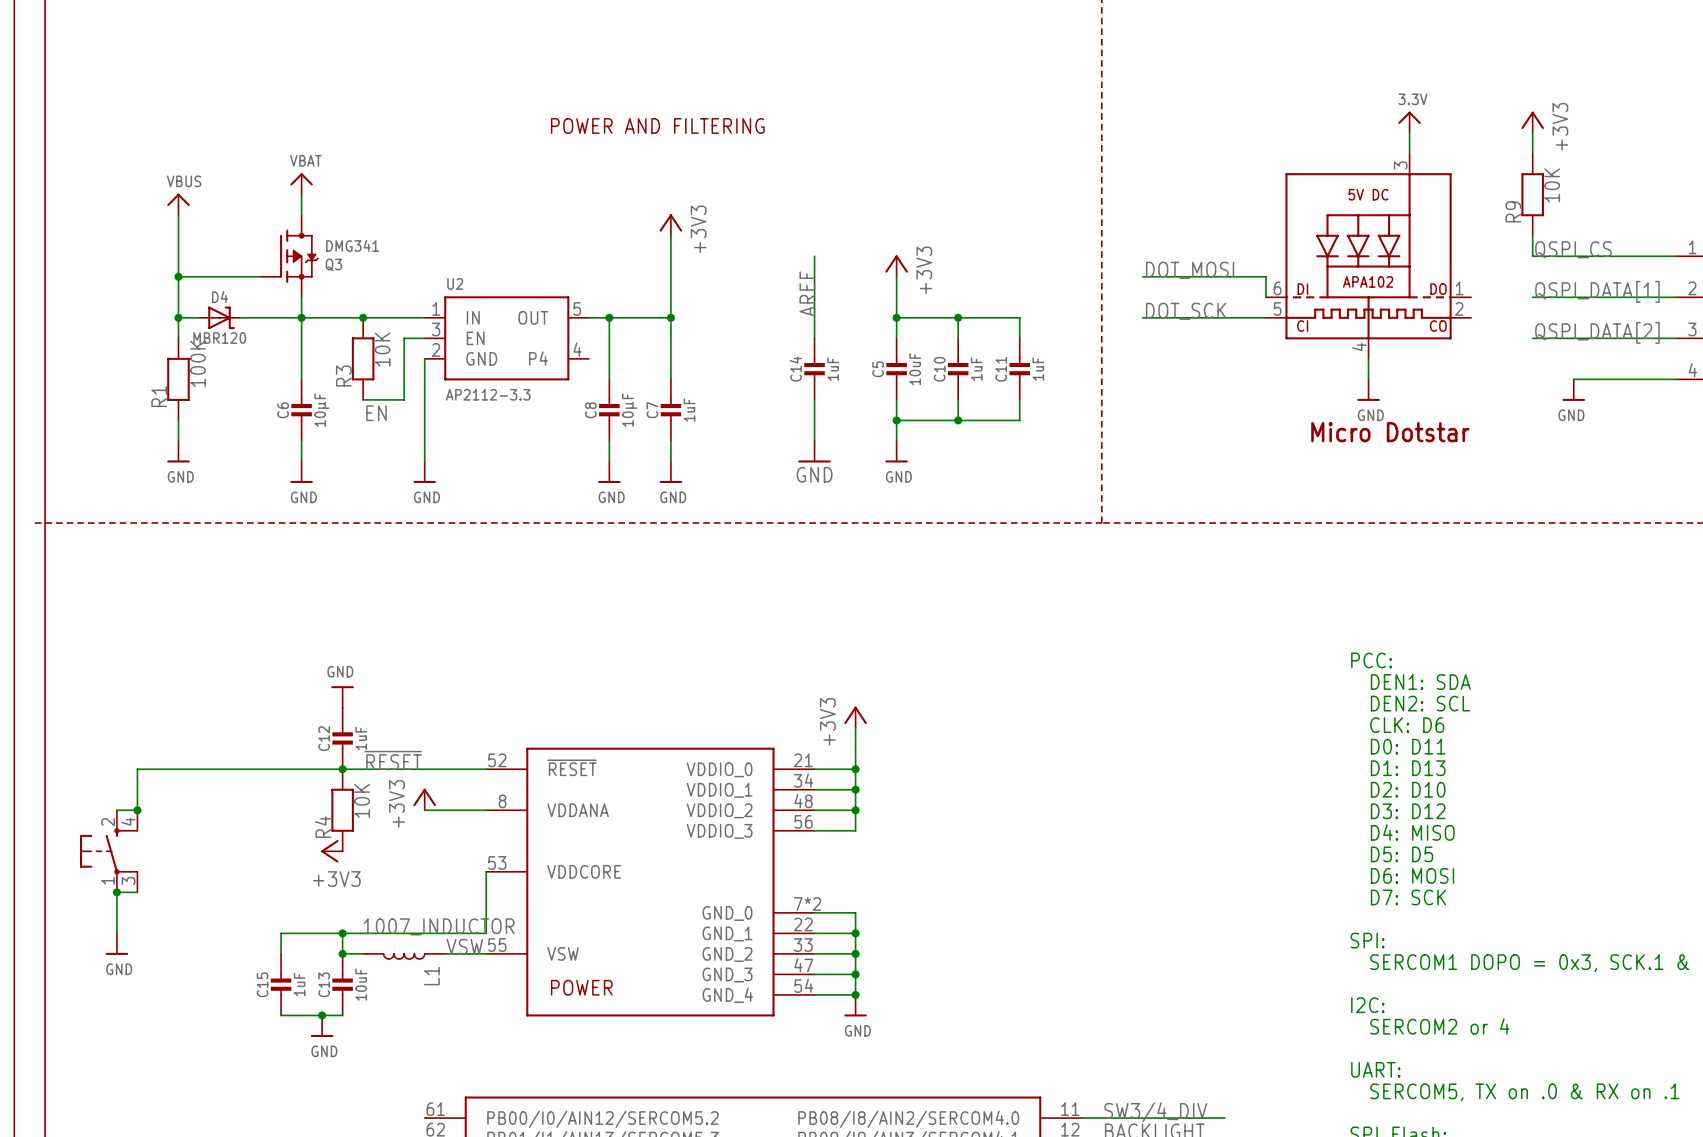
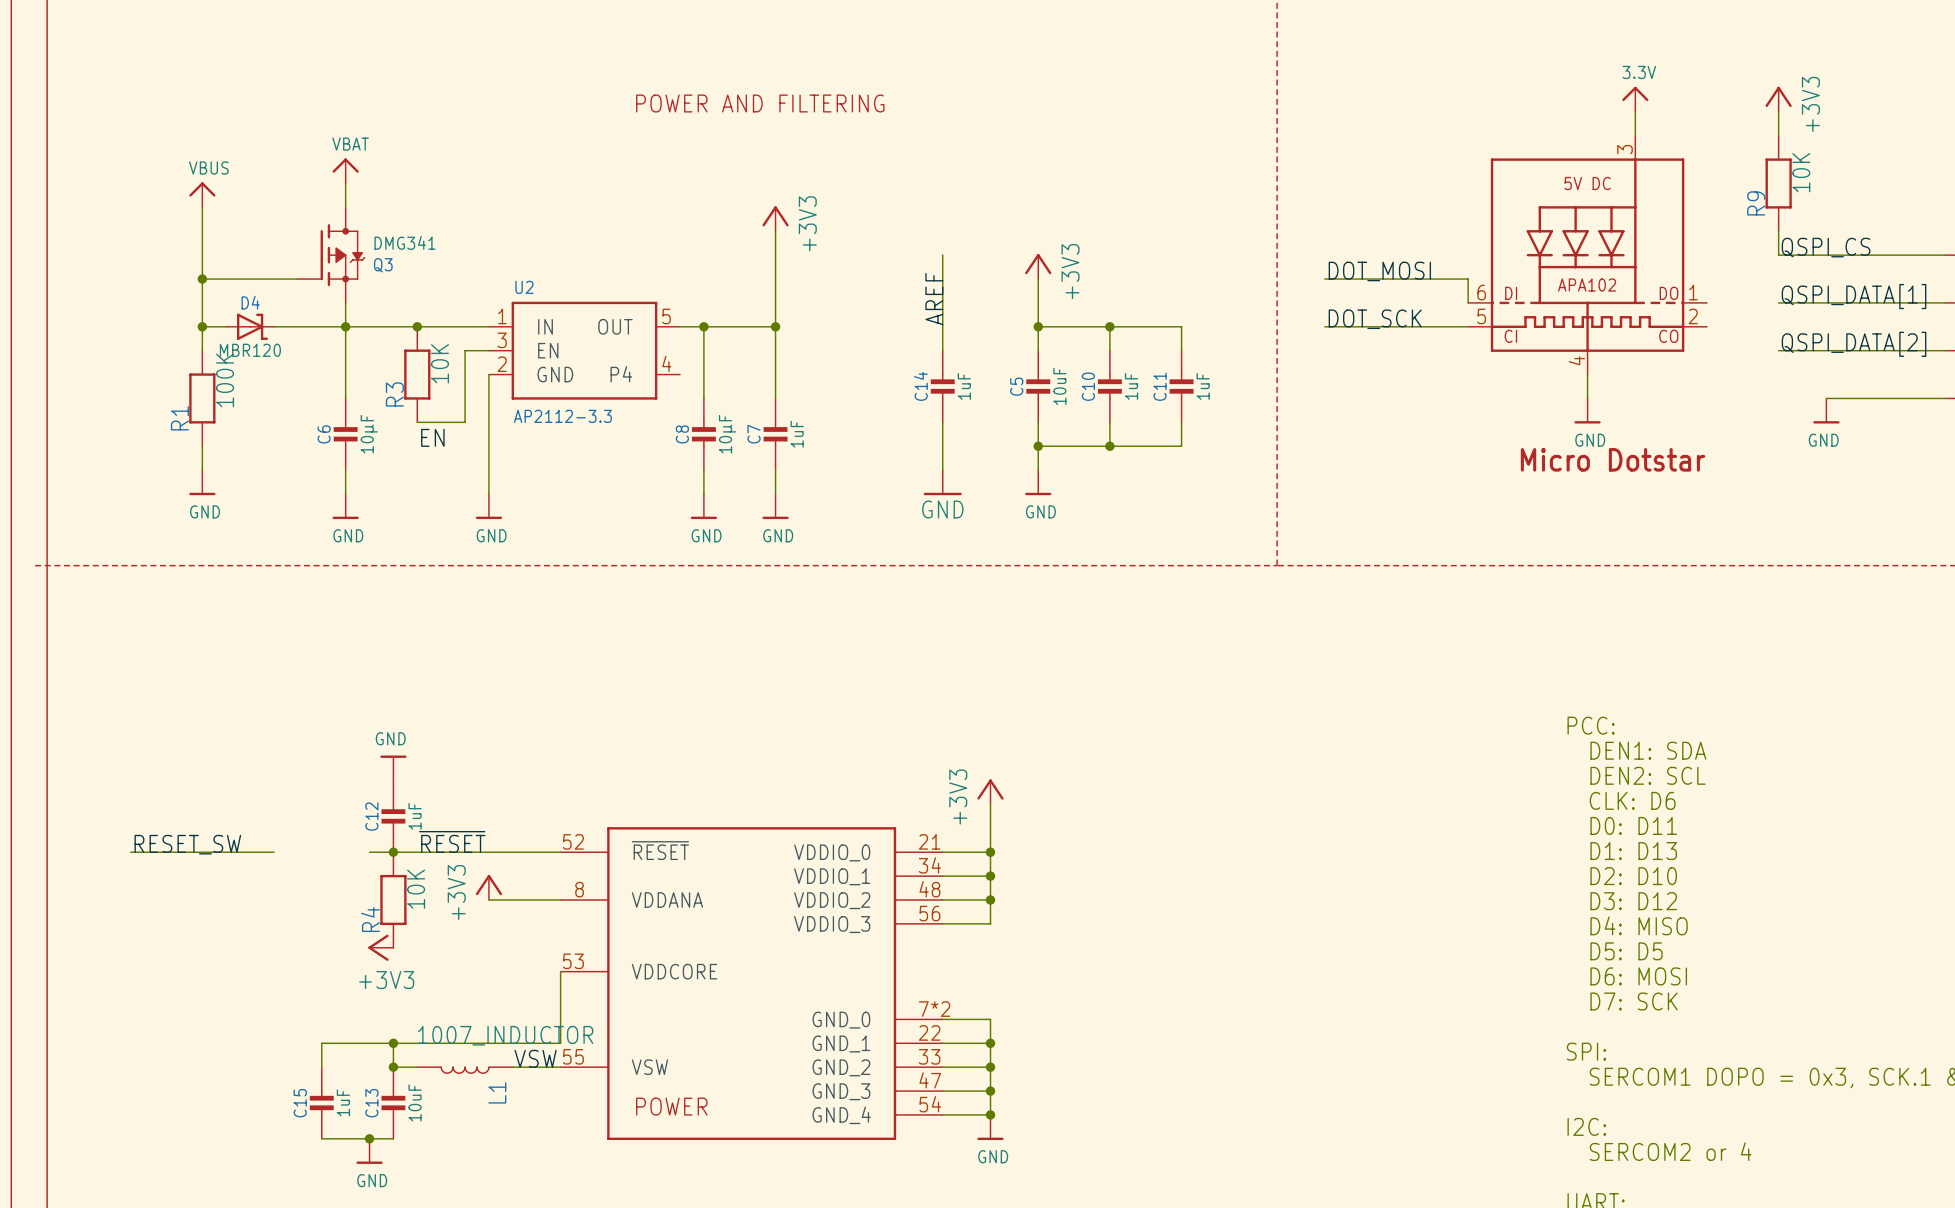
label: none -> RESET_SW (187, 844)
wire: (137, 769) (137, 810) (116, 810) -> (154, 852) (130, 852)
wire: (240, 769) (322, 769) -> none
junction: (137, 810) -> none
part: (109, 851) -> none
junction: (116, 892) -> none
wire: (137, 892) (116, 892) (116, 933) -> none
power symbol: GND (116, 944) -> none

